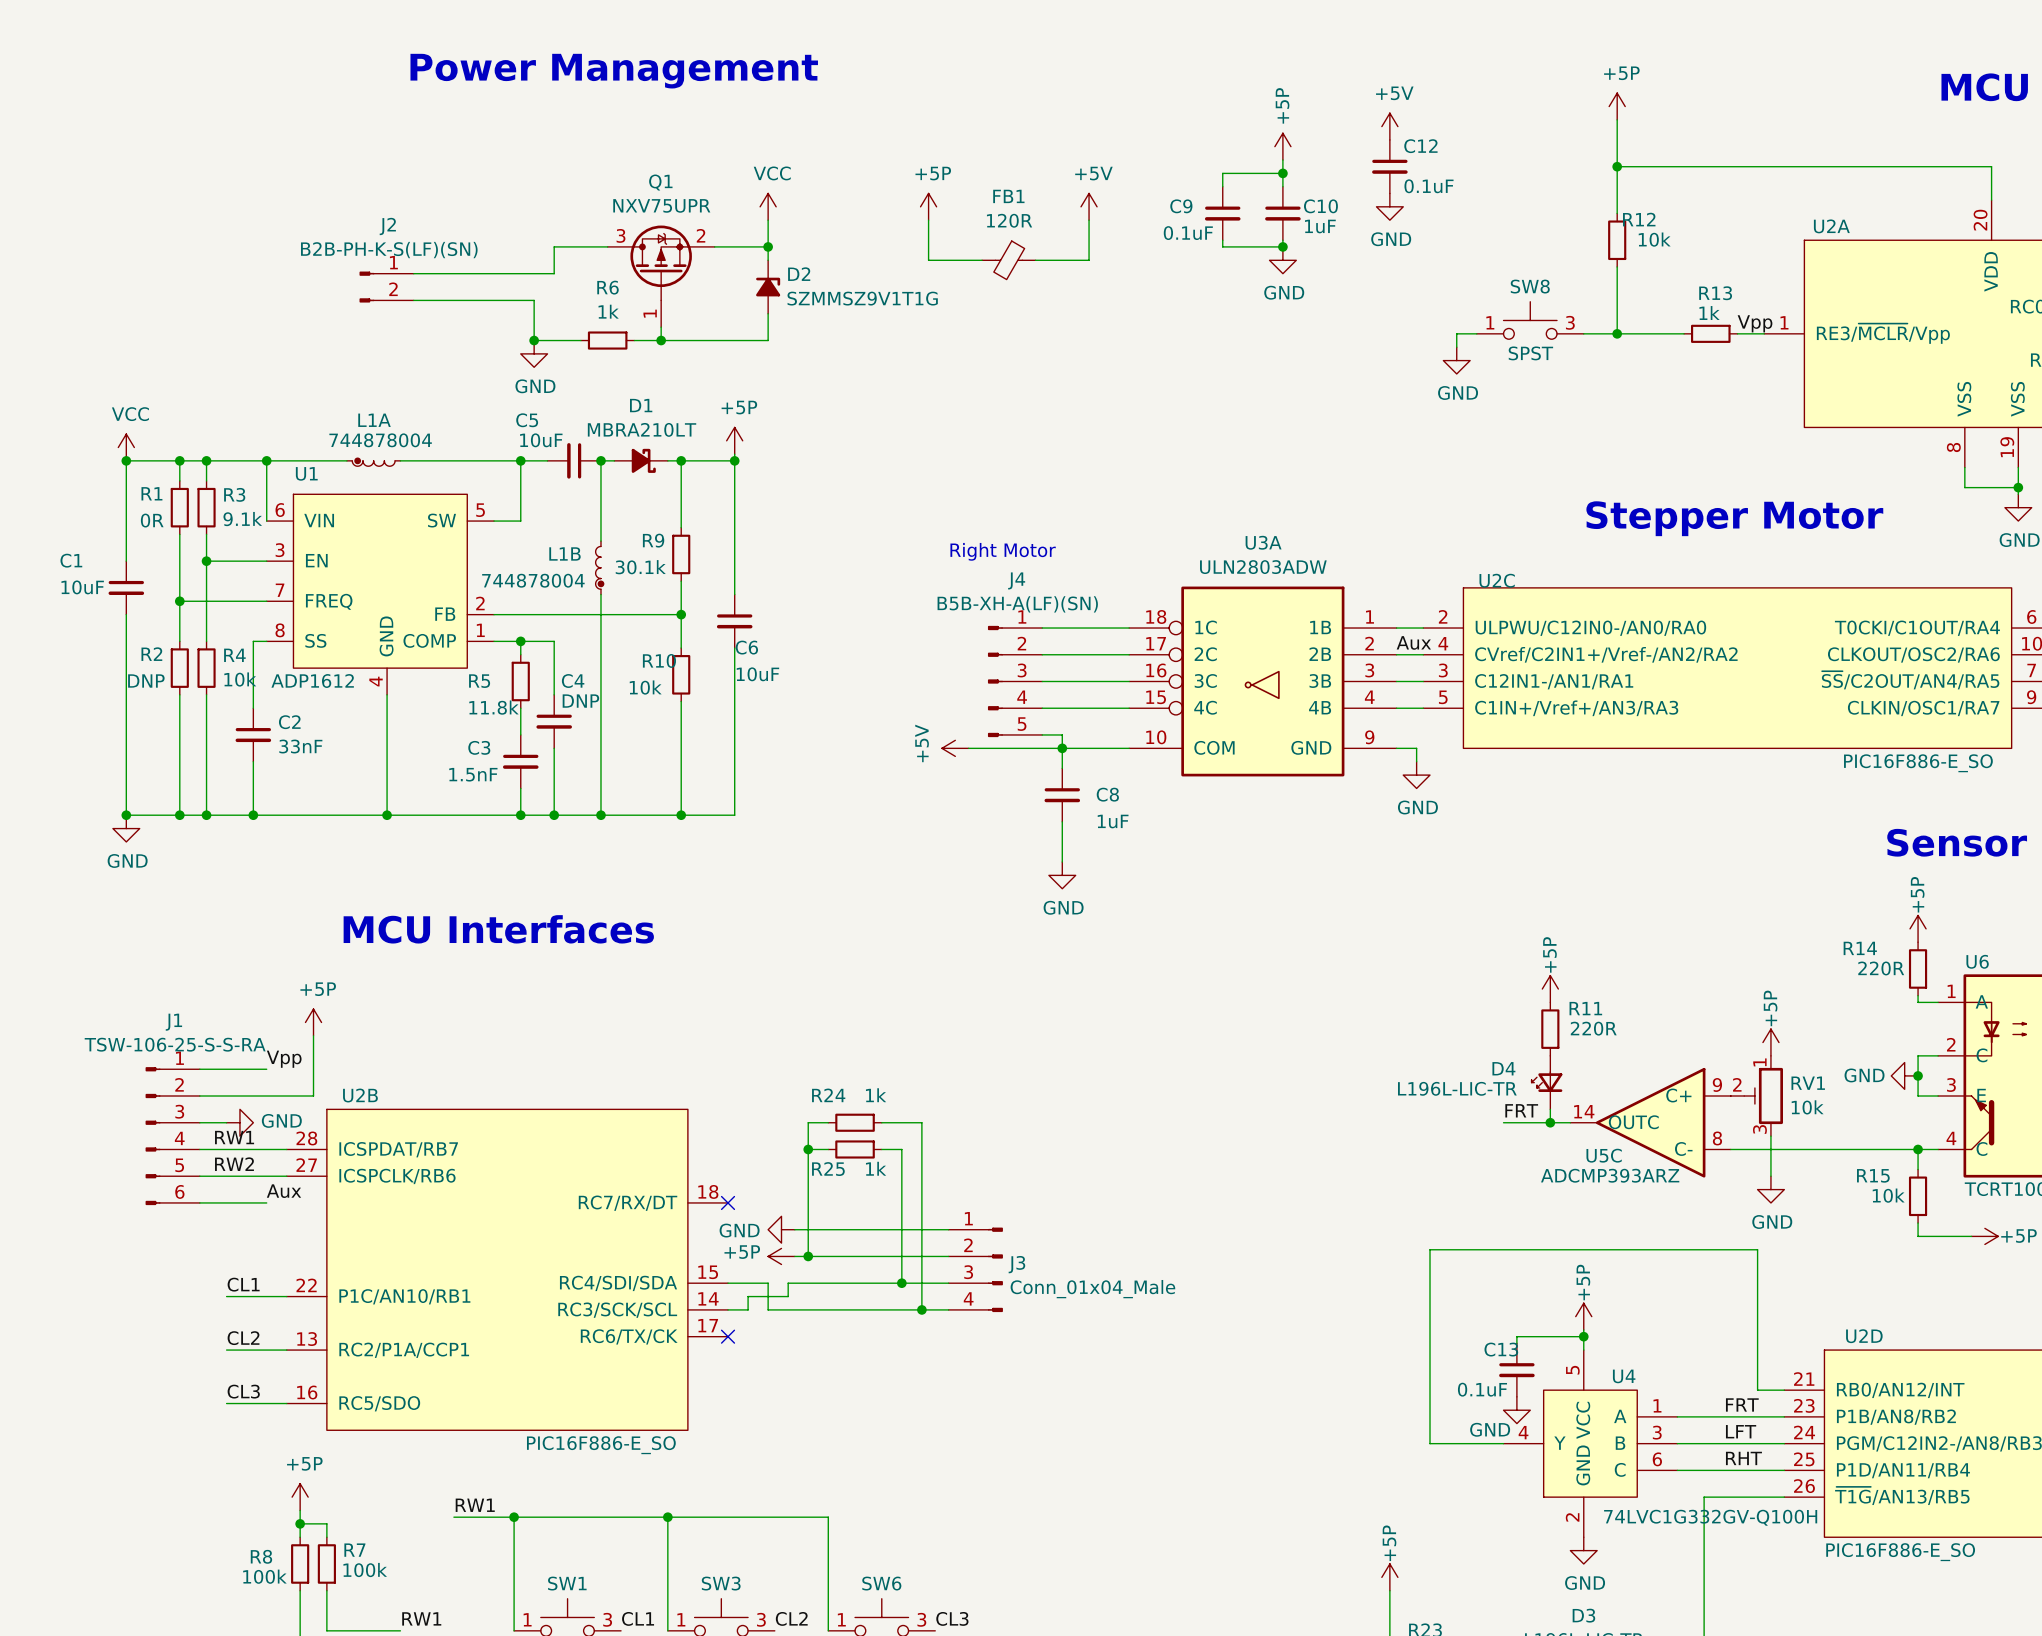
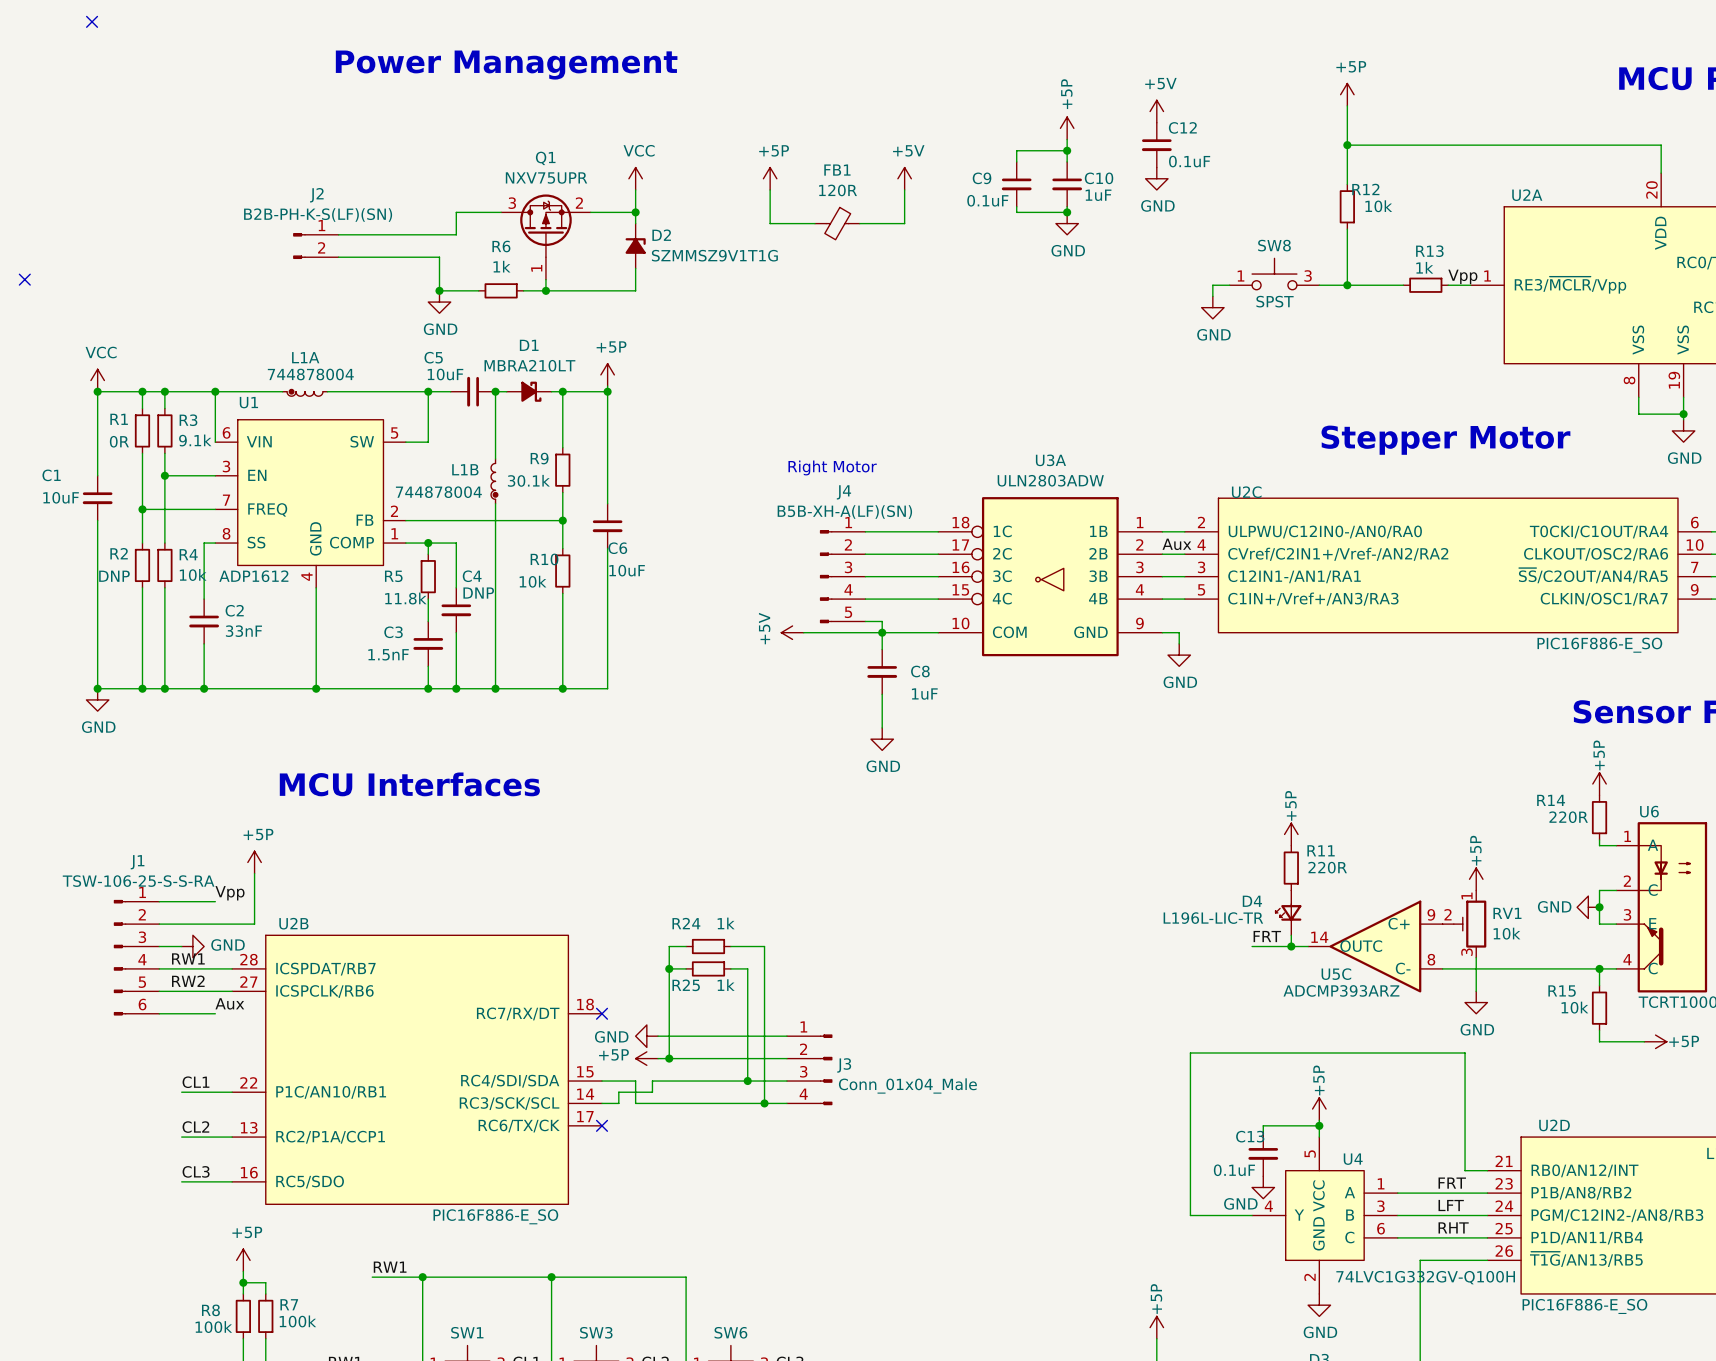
no-connect mark: none -> (92, 21)
no-connect mark: none -> (24, 279)

